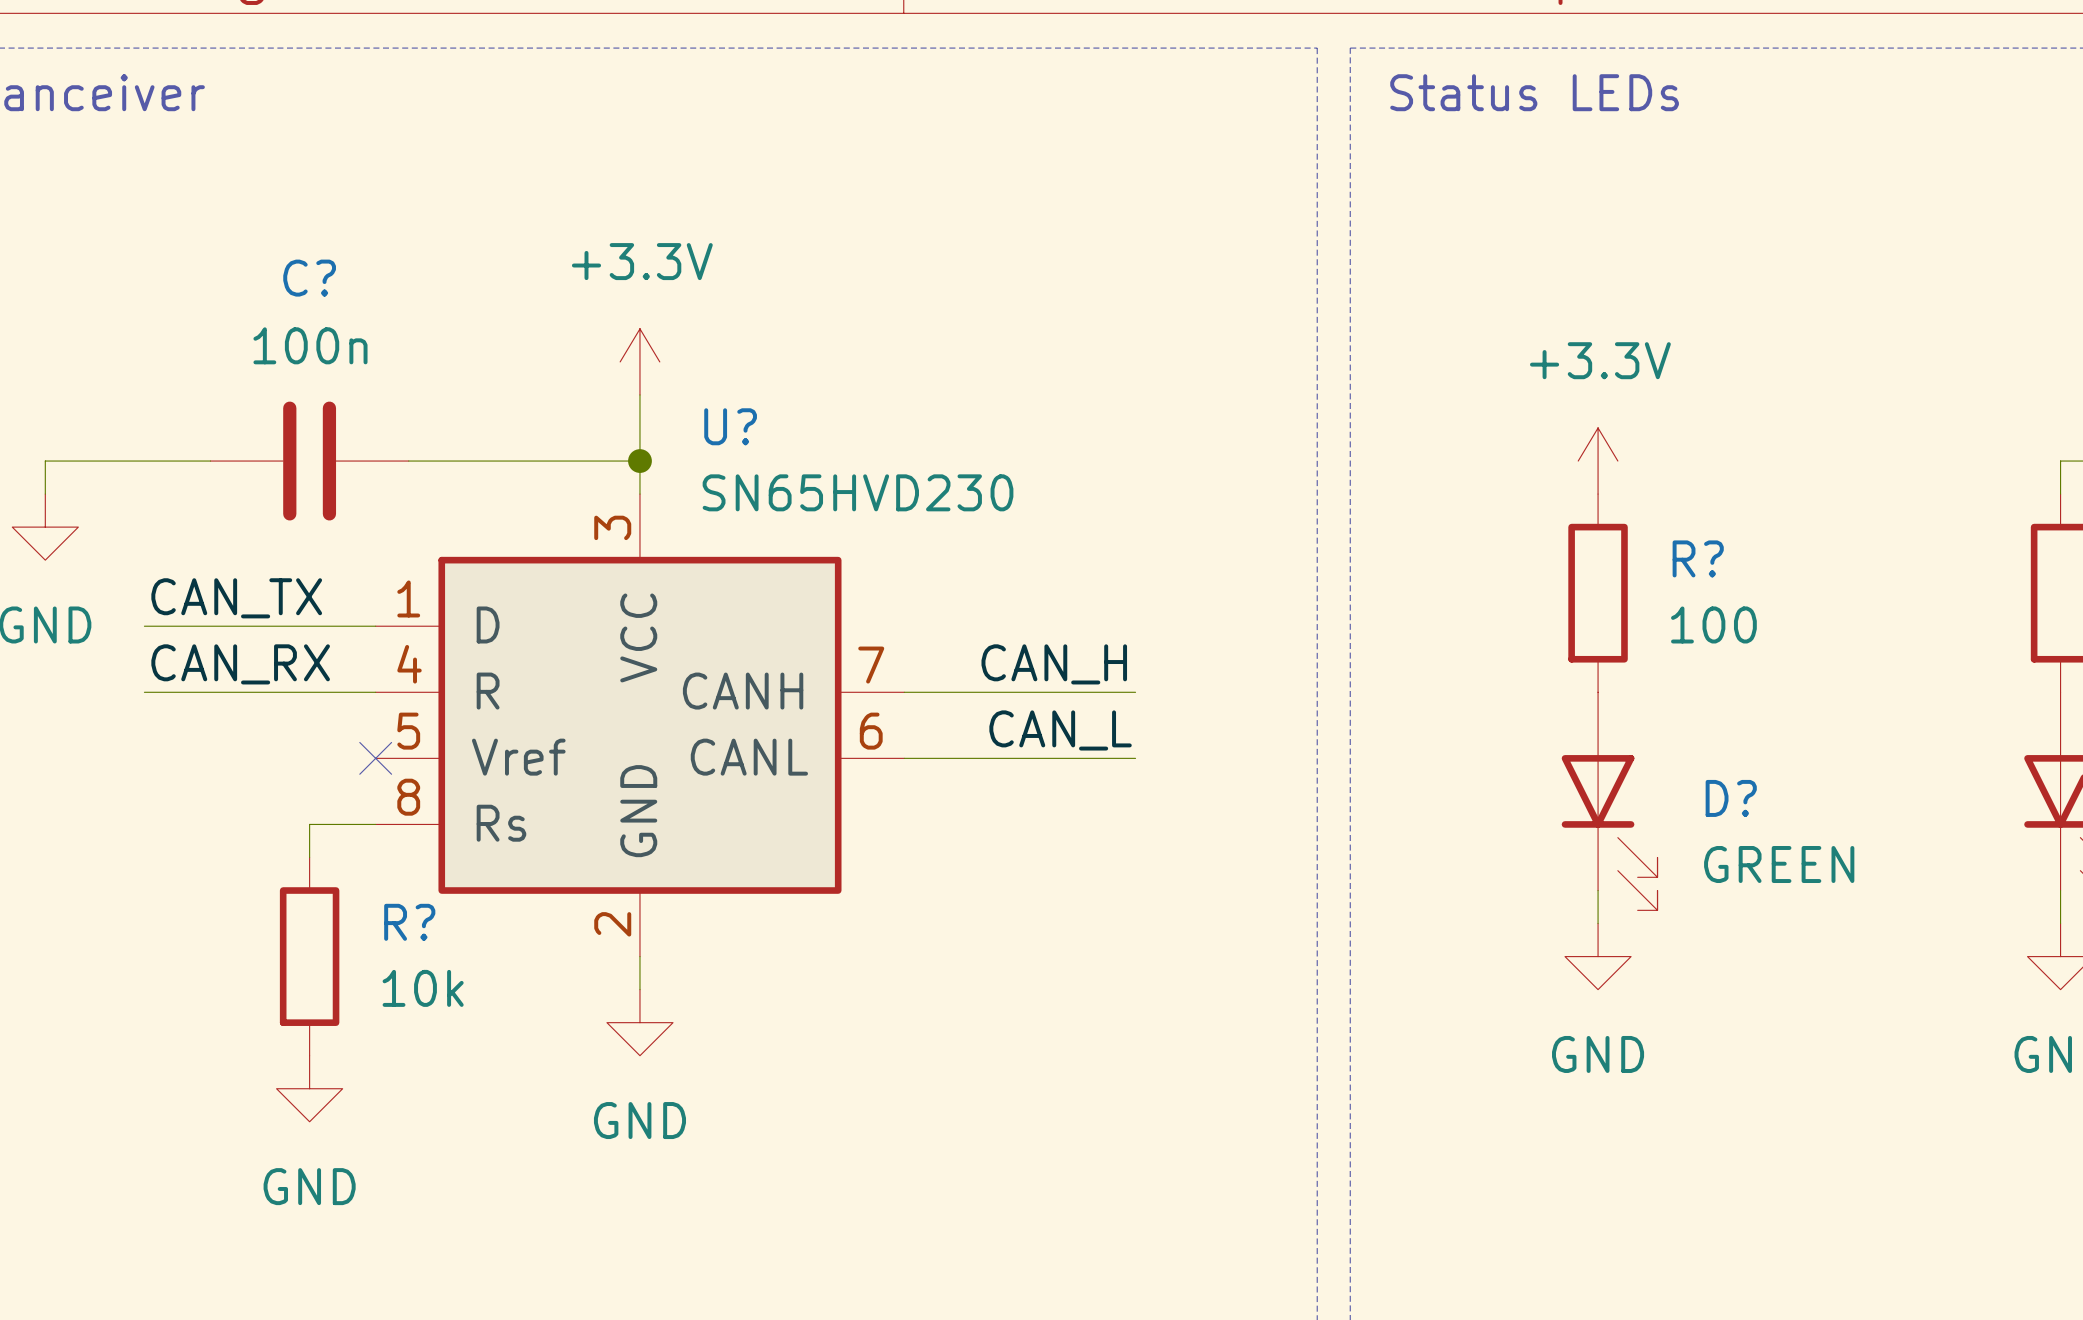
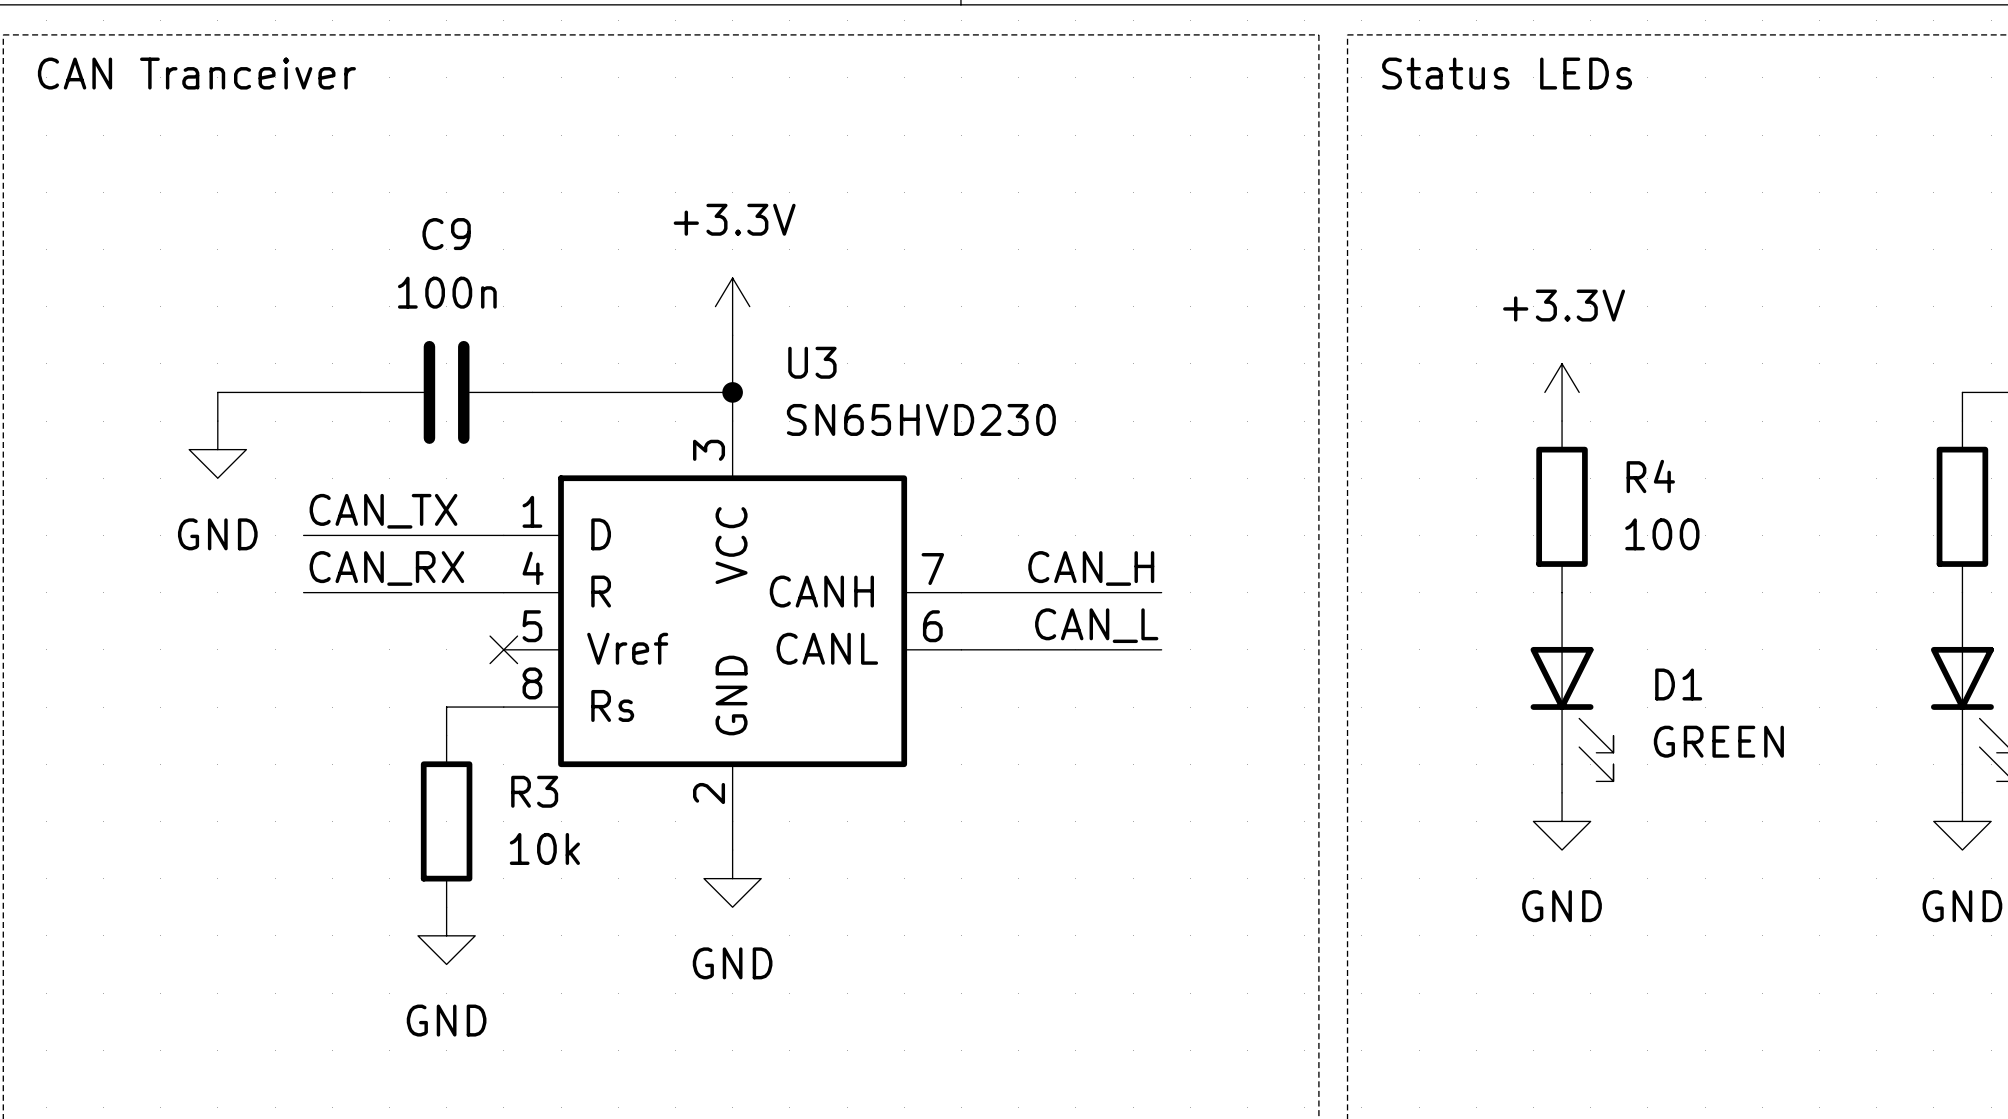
C? name: C? (309, 278) -> C9 (446, 234)
U? name: U? (730, 426) -> U3 (812, 362)
R? name: R? (1698, 558) -> R4 (1650, 476)
D? name: D? (1731, 798) -> D1 (1678, 684)
R? name: R? (409, 922) -> R3 (534, 791)

